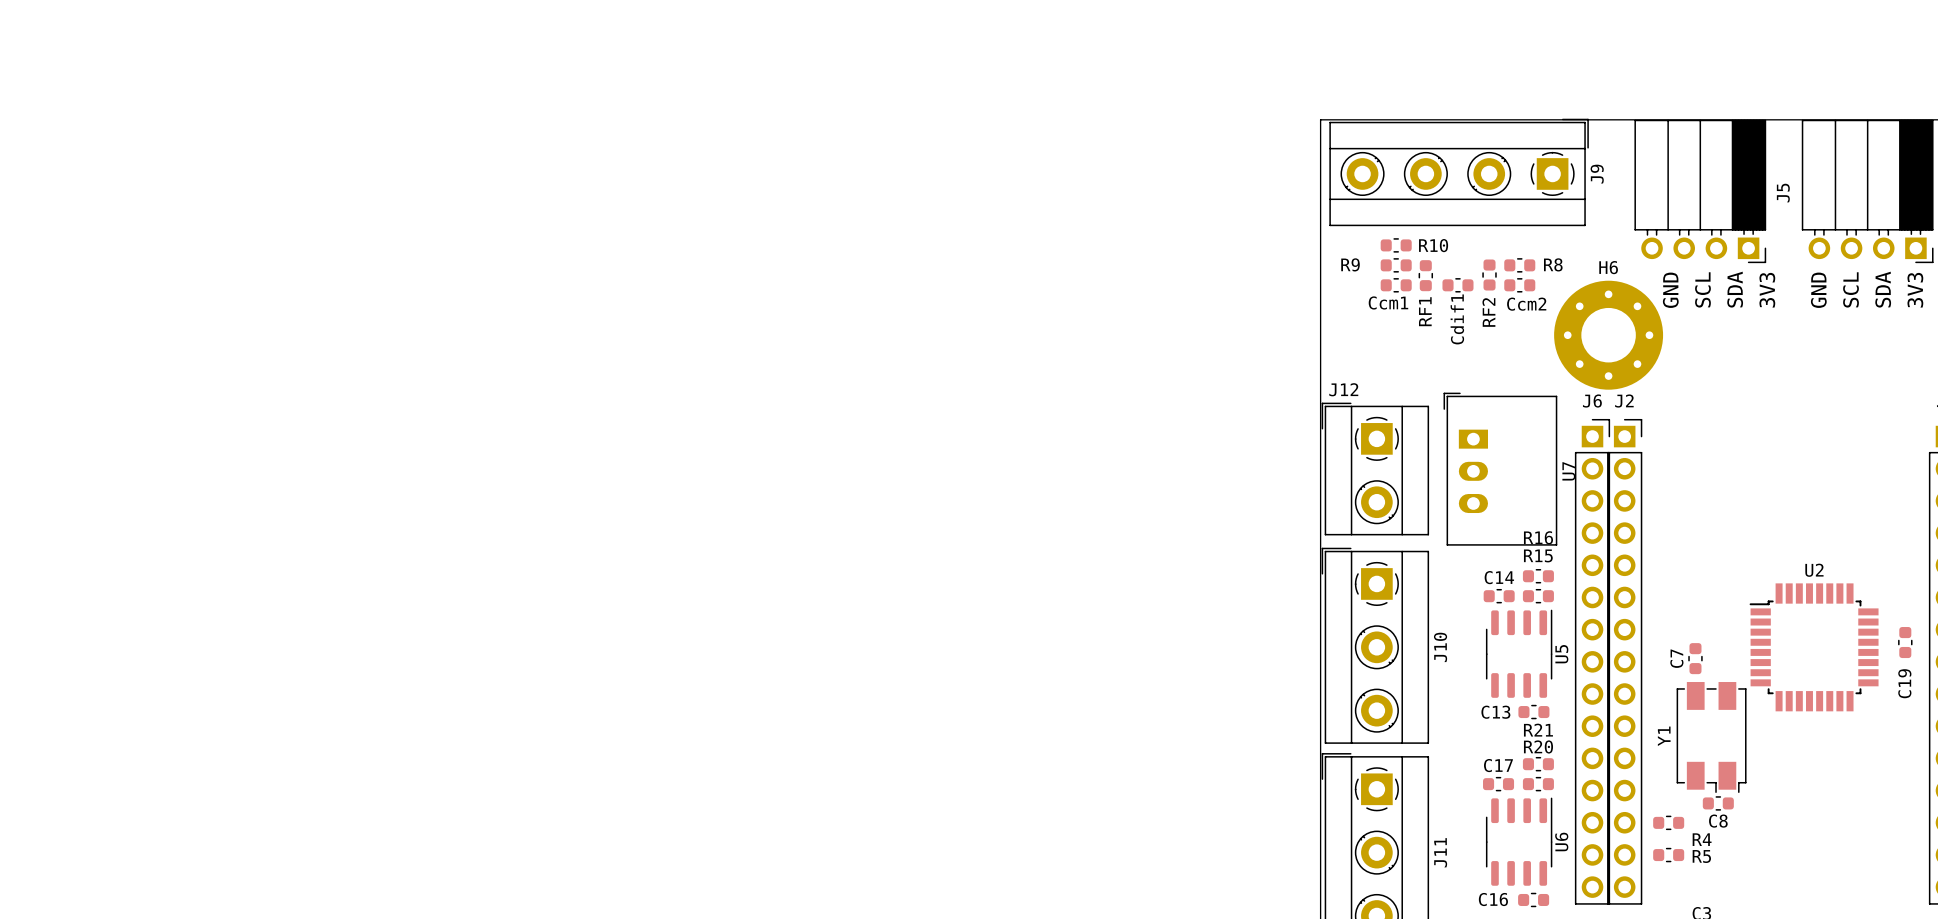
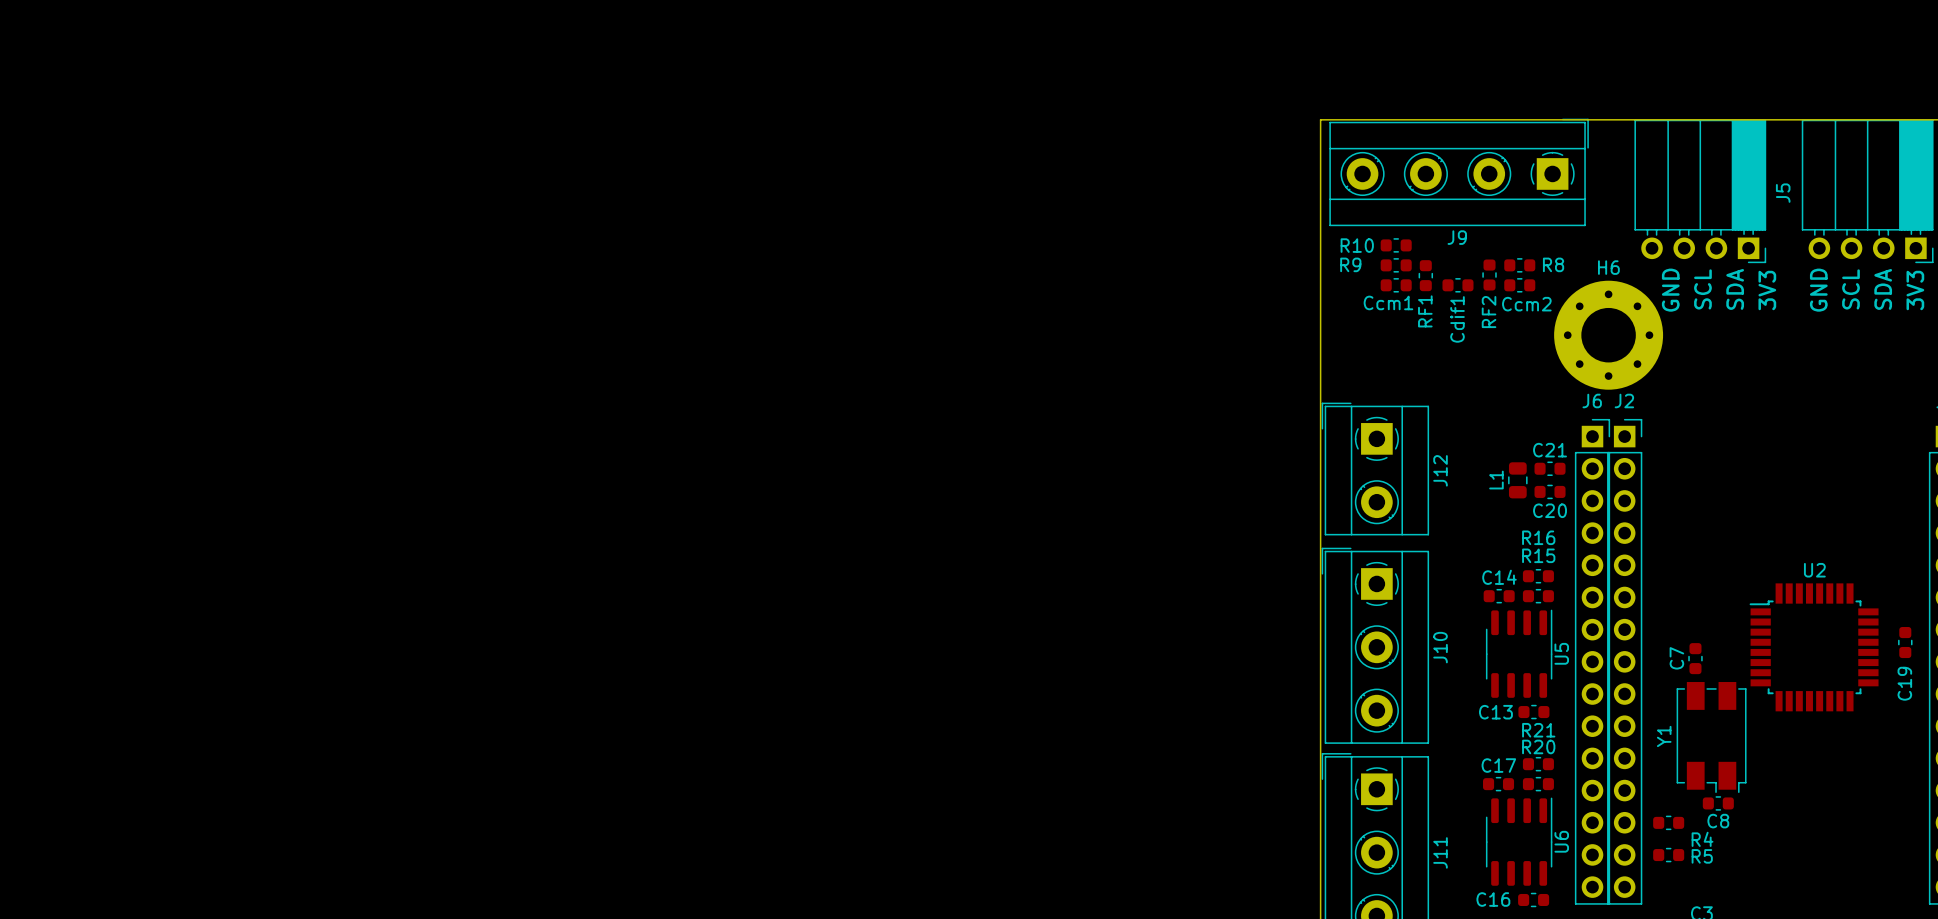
J9 name rotation: 0° (1597, 174) -> 90° clockwise (1457, 237)
J9 name position: J9 (1597, 174) -> J9 (1457, 237)
R10 name position: R10 (1433, 245) -> R10 (1357, 245)
J12 name rotation: 0° (1343, 389) -> 90° counterclockwise (1440, 470)
J12 name position: J12 (1343, 389) -> J12 (1440, 470)
C21: none -> (1550, 468)
U7: (1500, 469) -> none
L1: none -> (1517, 480)
C20: none -> (1550, 491)

